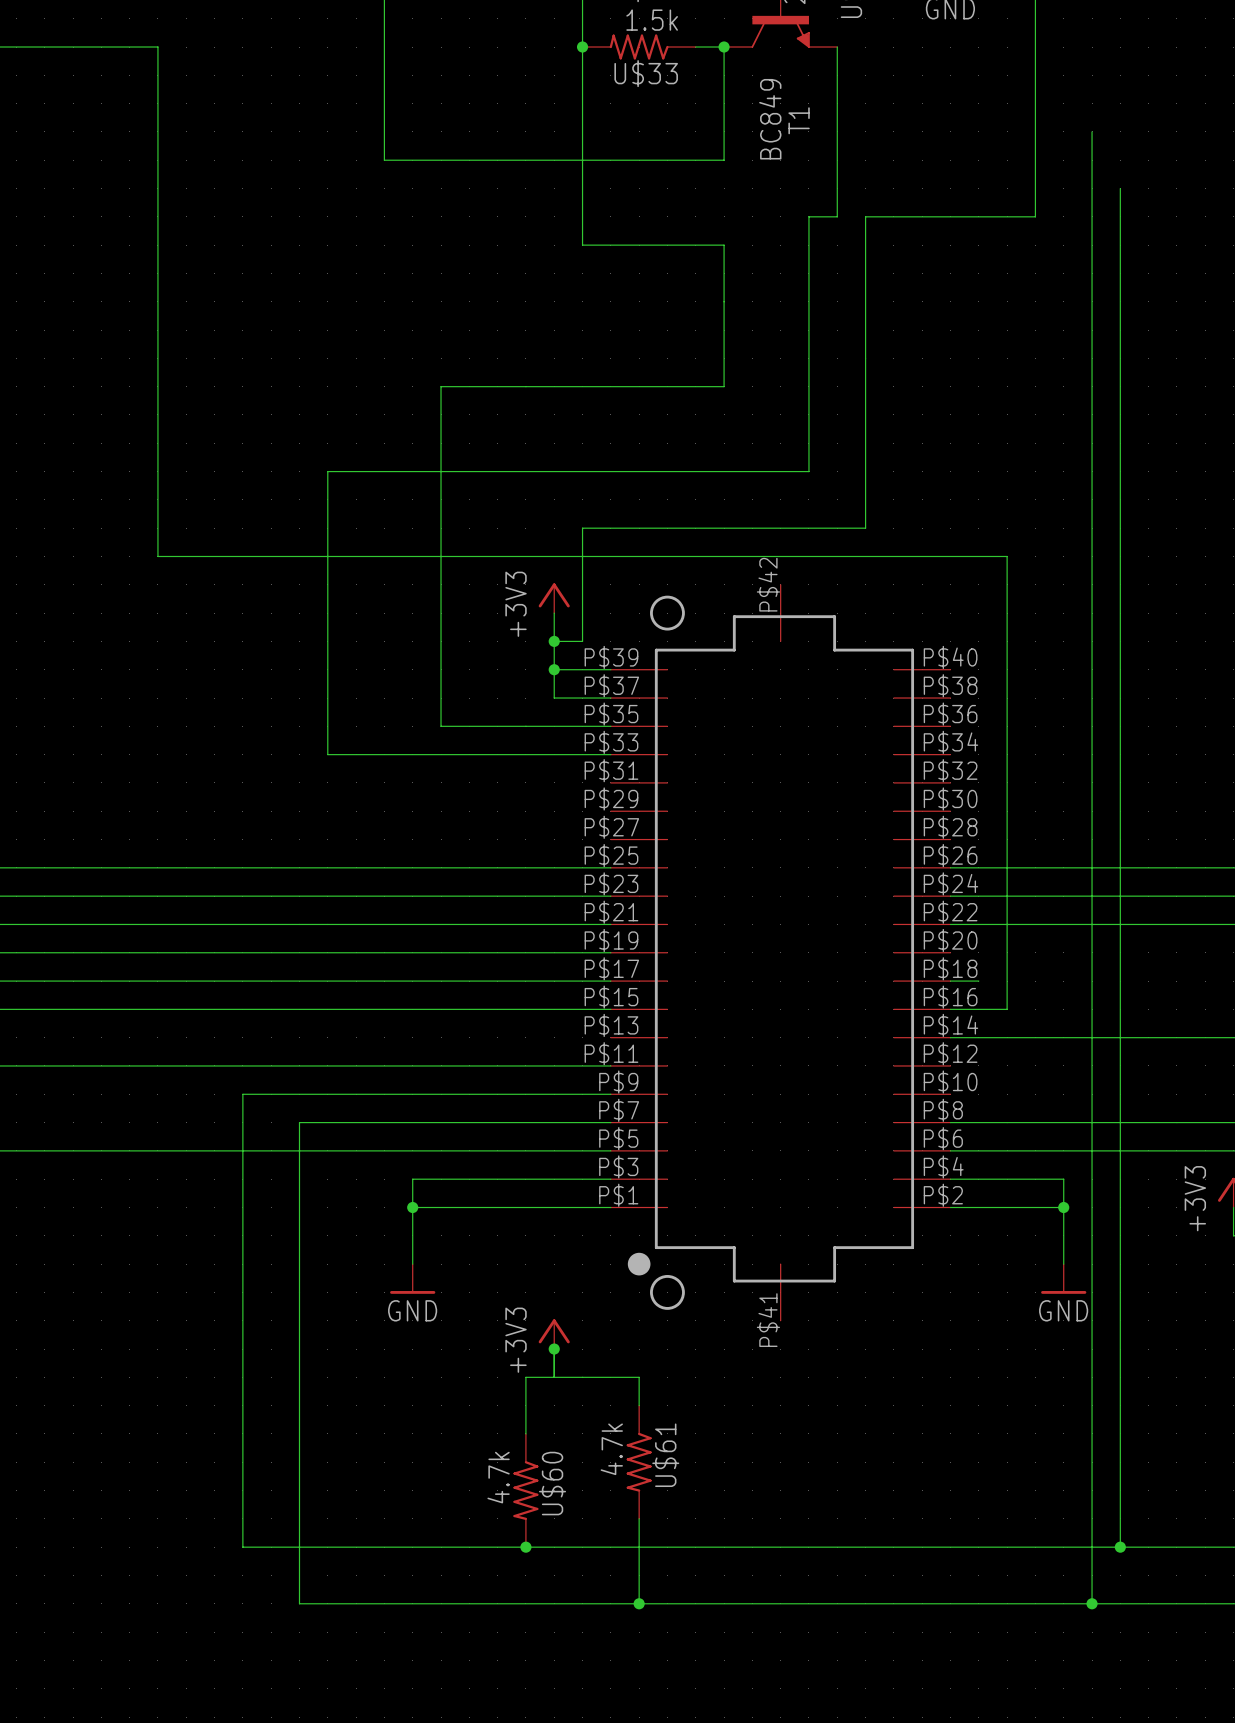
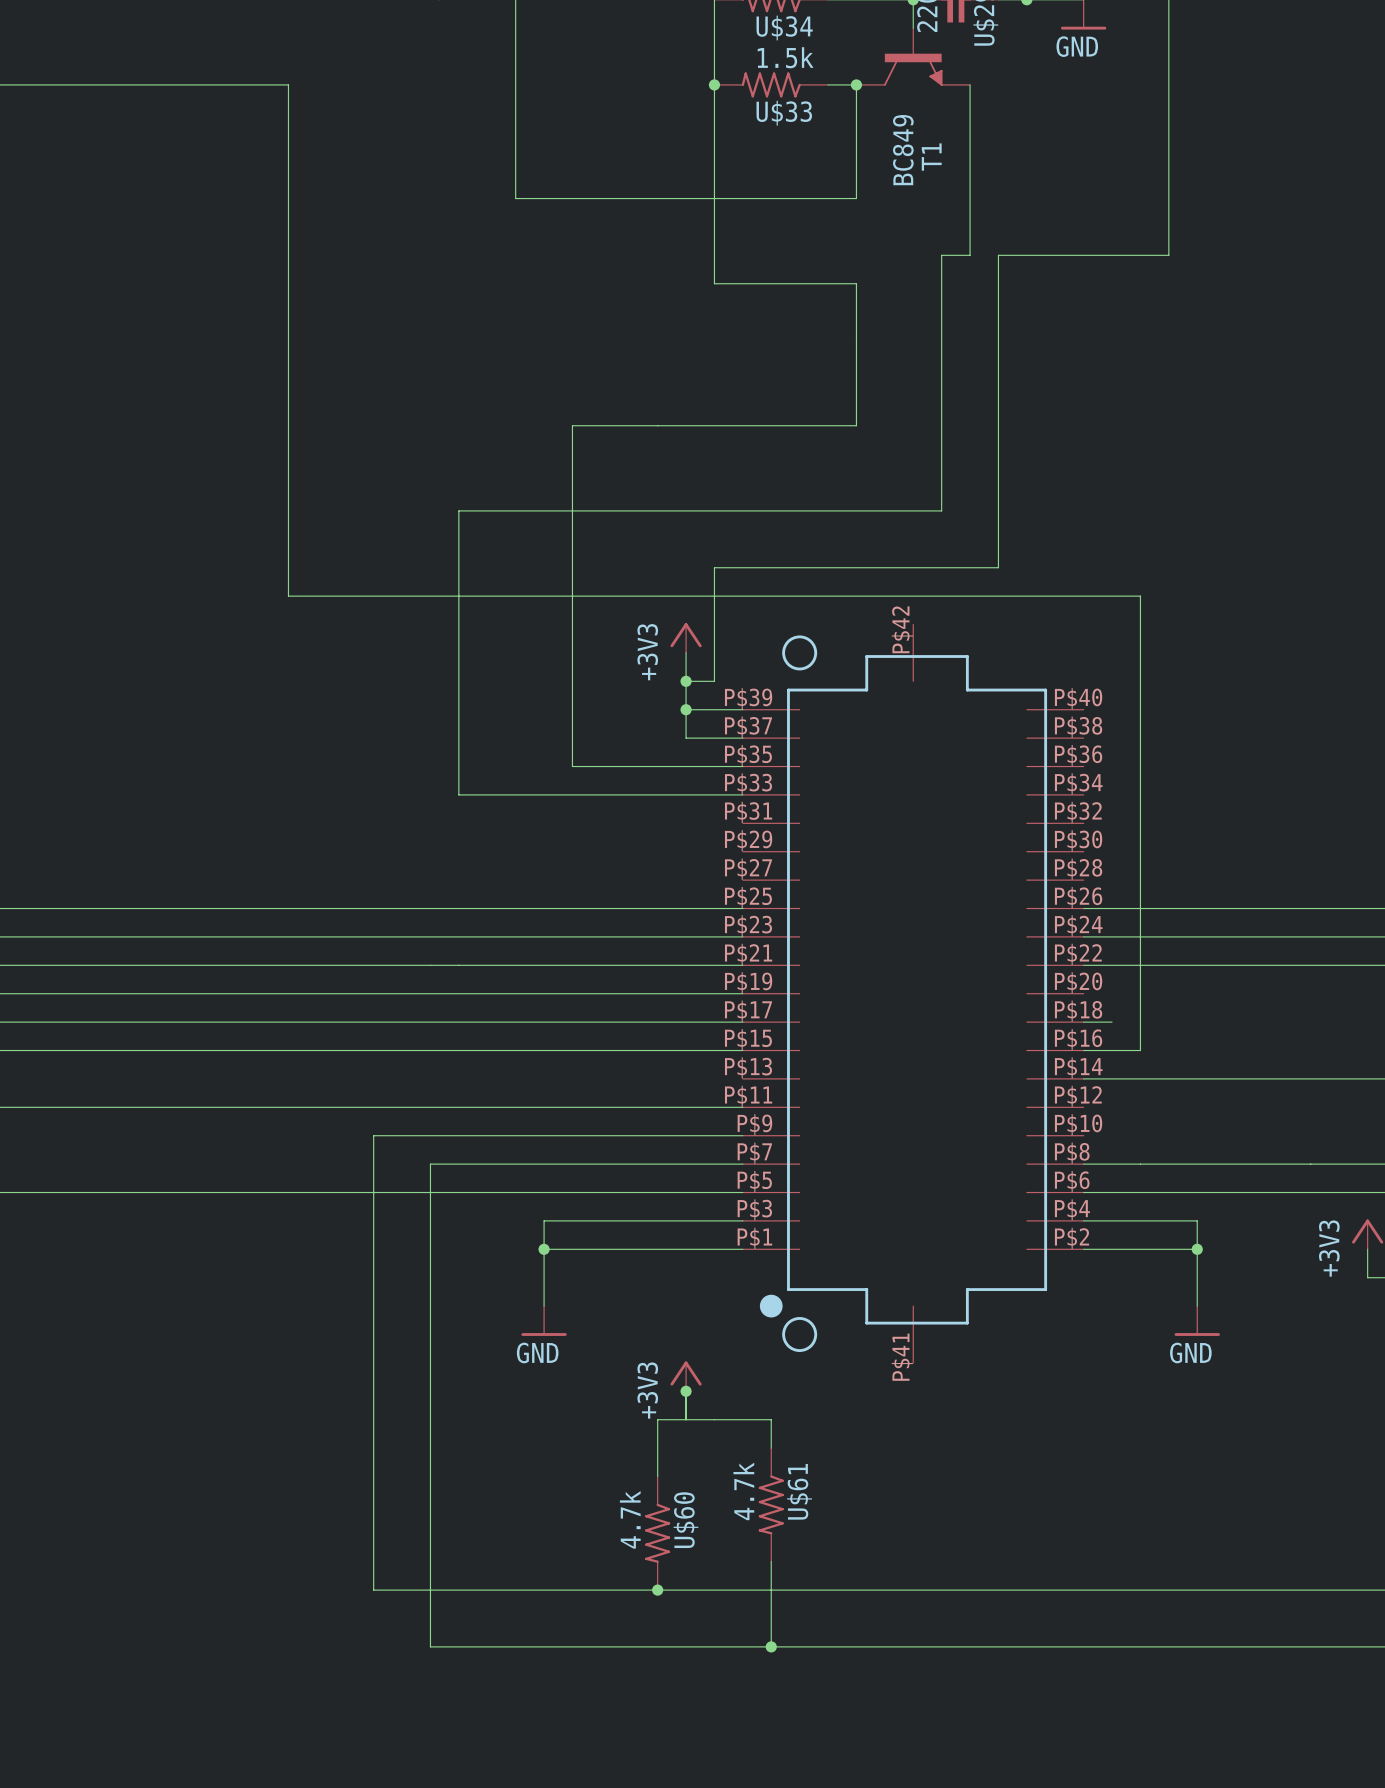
wire: (1092, 131) (1092, 1603) -> none
wire: (1120, 188) (1120, 1547) -> none
junction: (1120, 1547) -> none
junction: (1092, 1603) -> none

